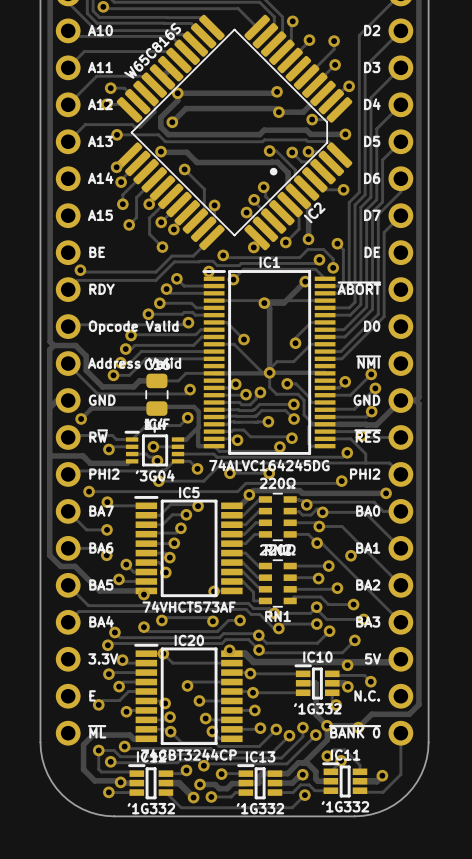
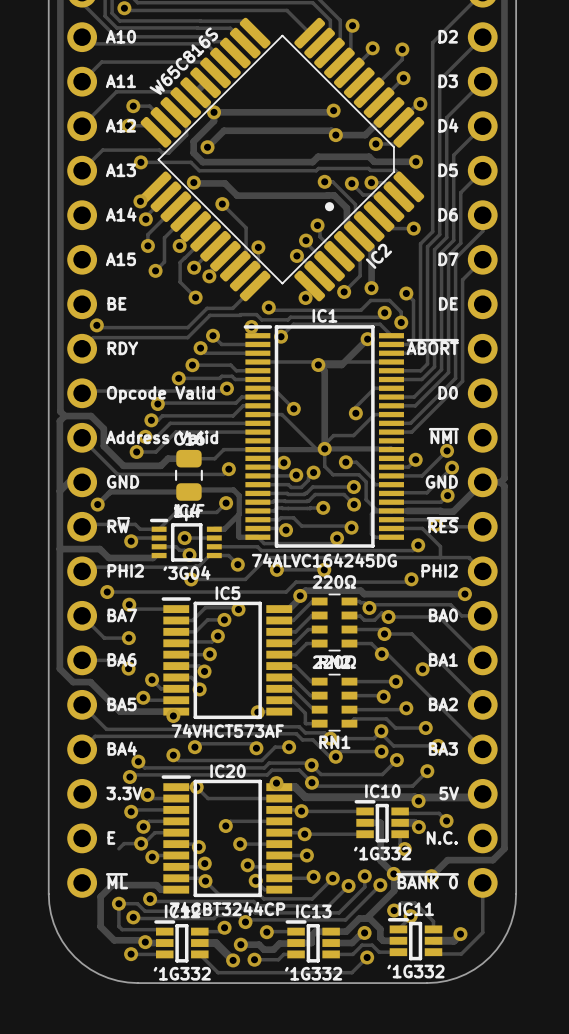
via position: (98, 704) -> (141, 843)

